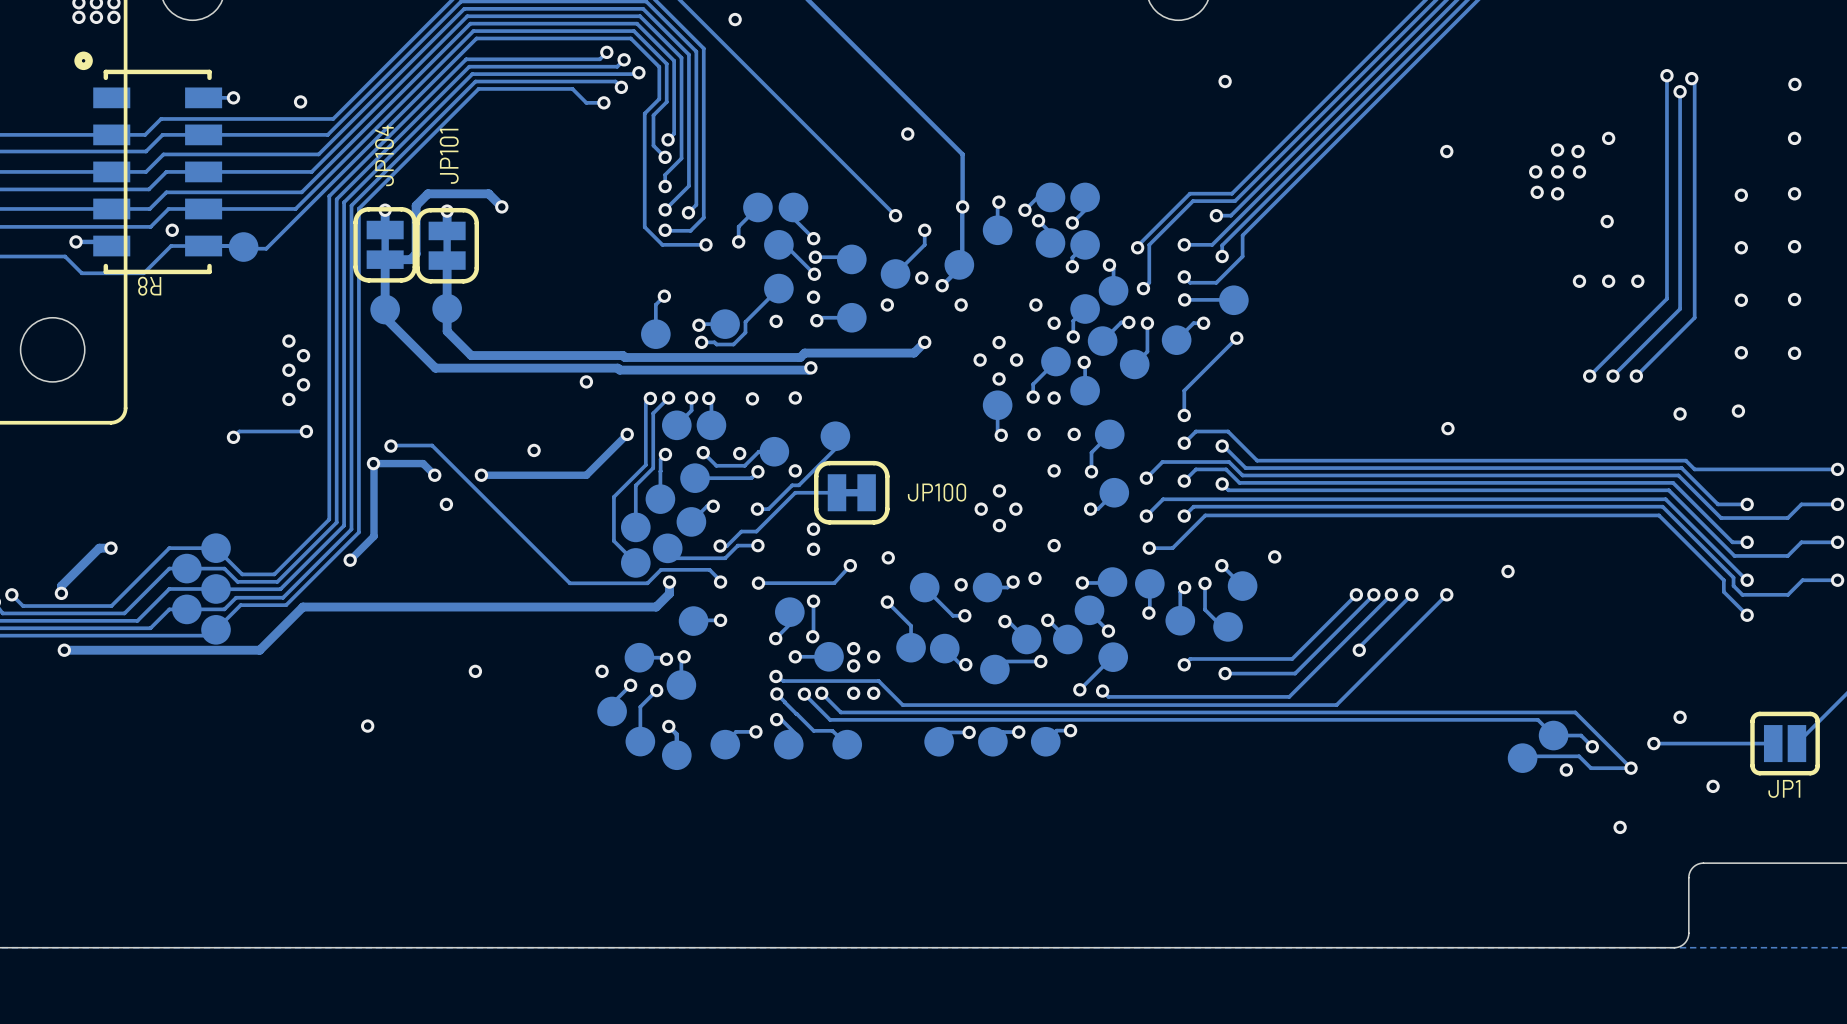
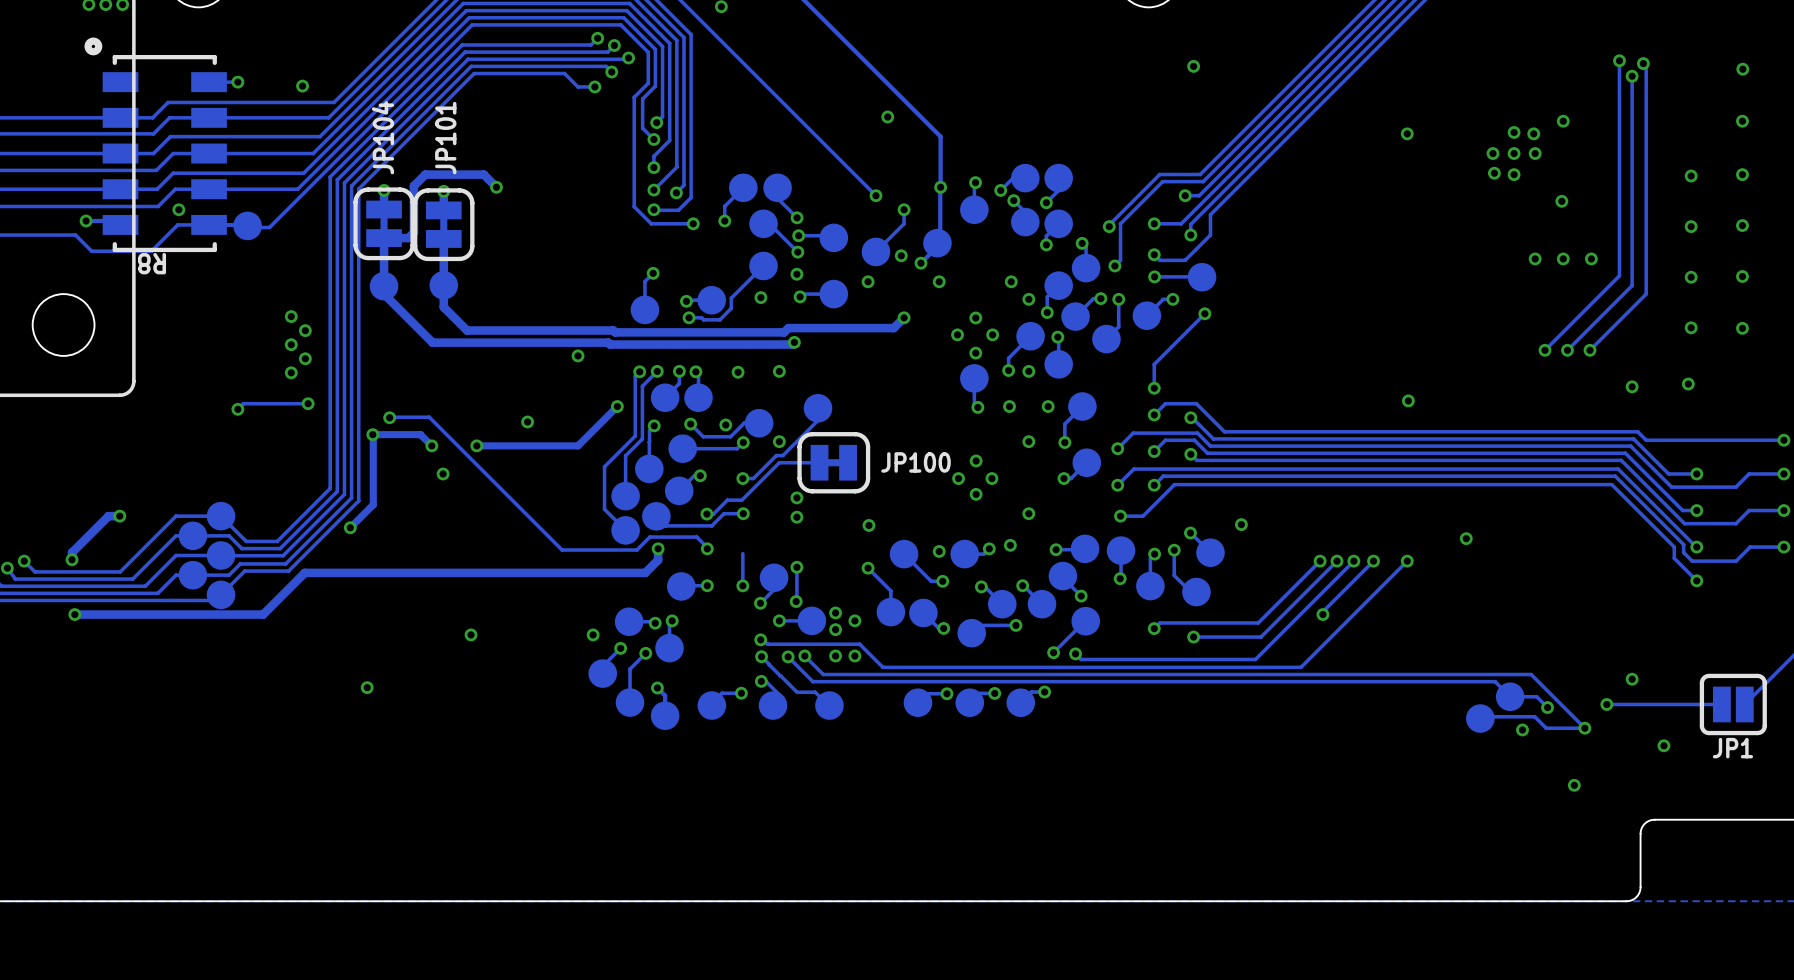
track: (850, 565) (834, 583) (758, 583) -> none
via: (850, 565) -> none
via position: (758, 583) -> (742, 585)
track: none -> (742, 553) (742, 585)

